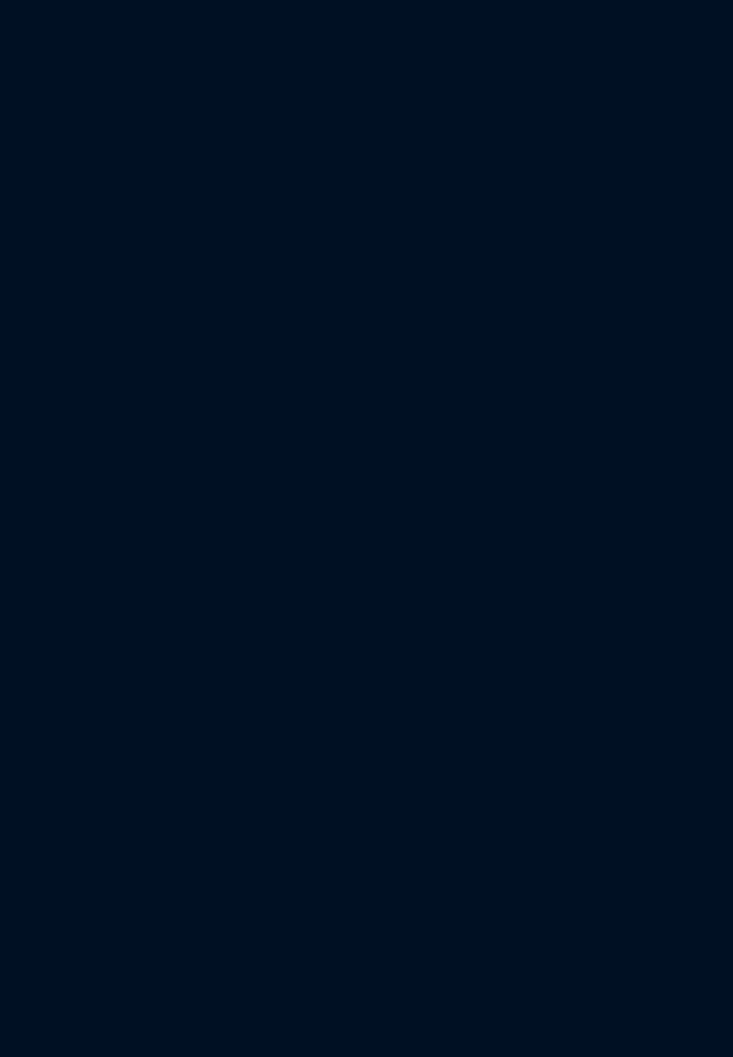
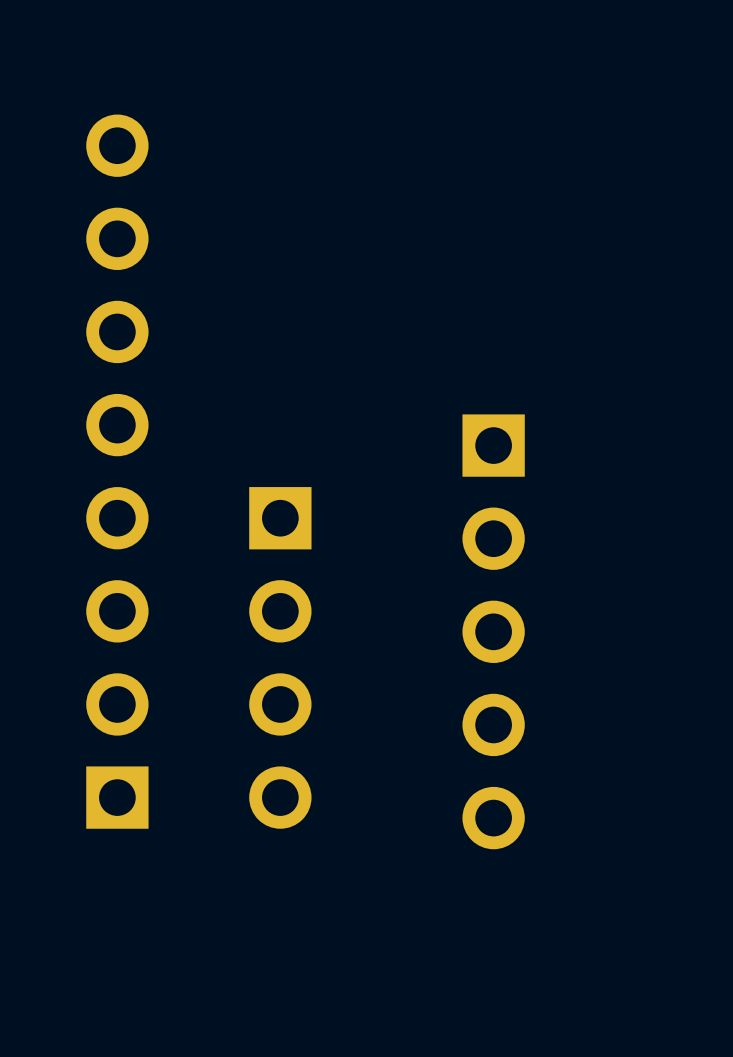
part: none -> (117, 471)
part: none -> (493, 631)
part: none -> (280, 657)

